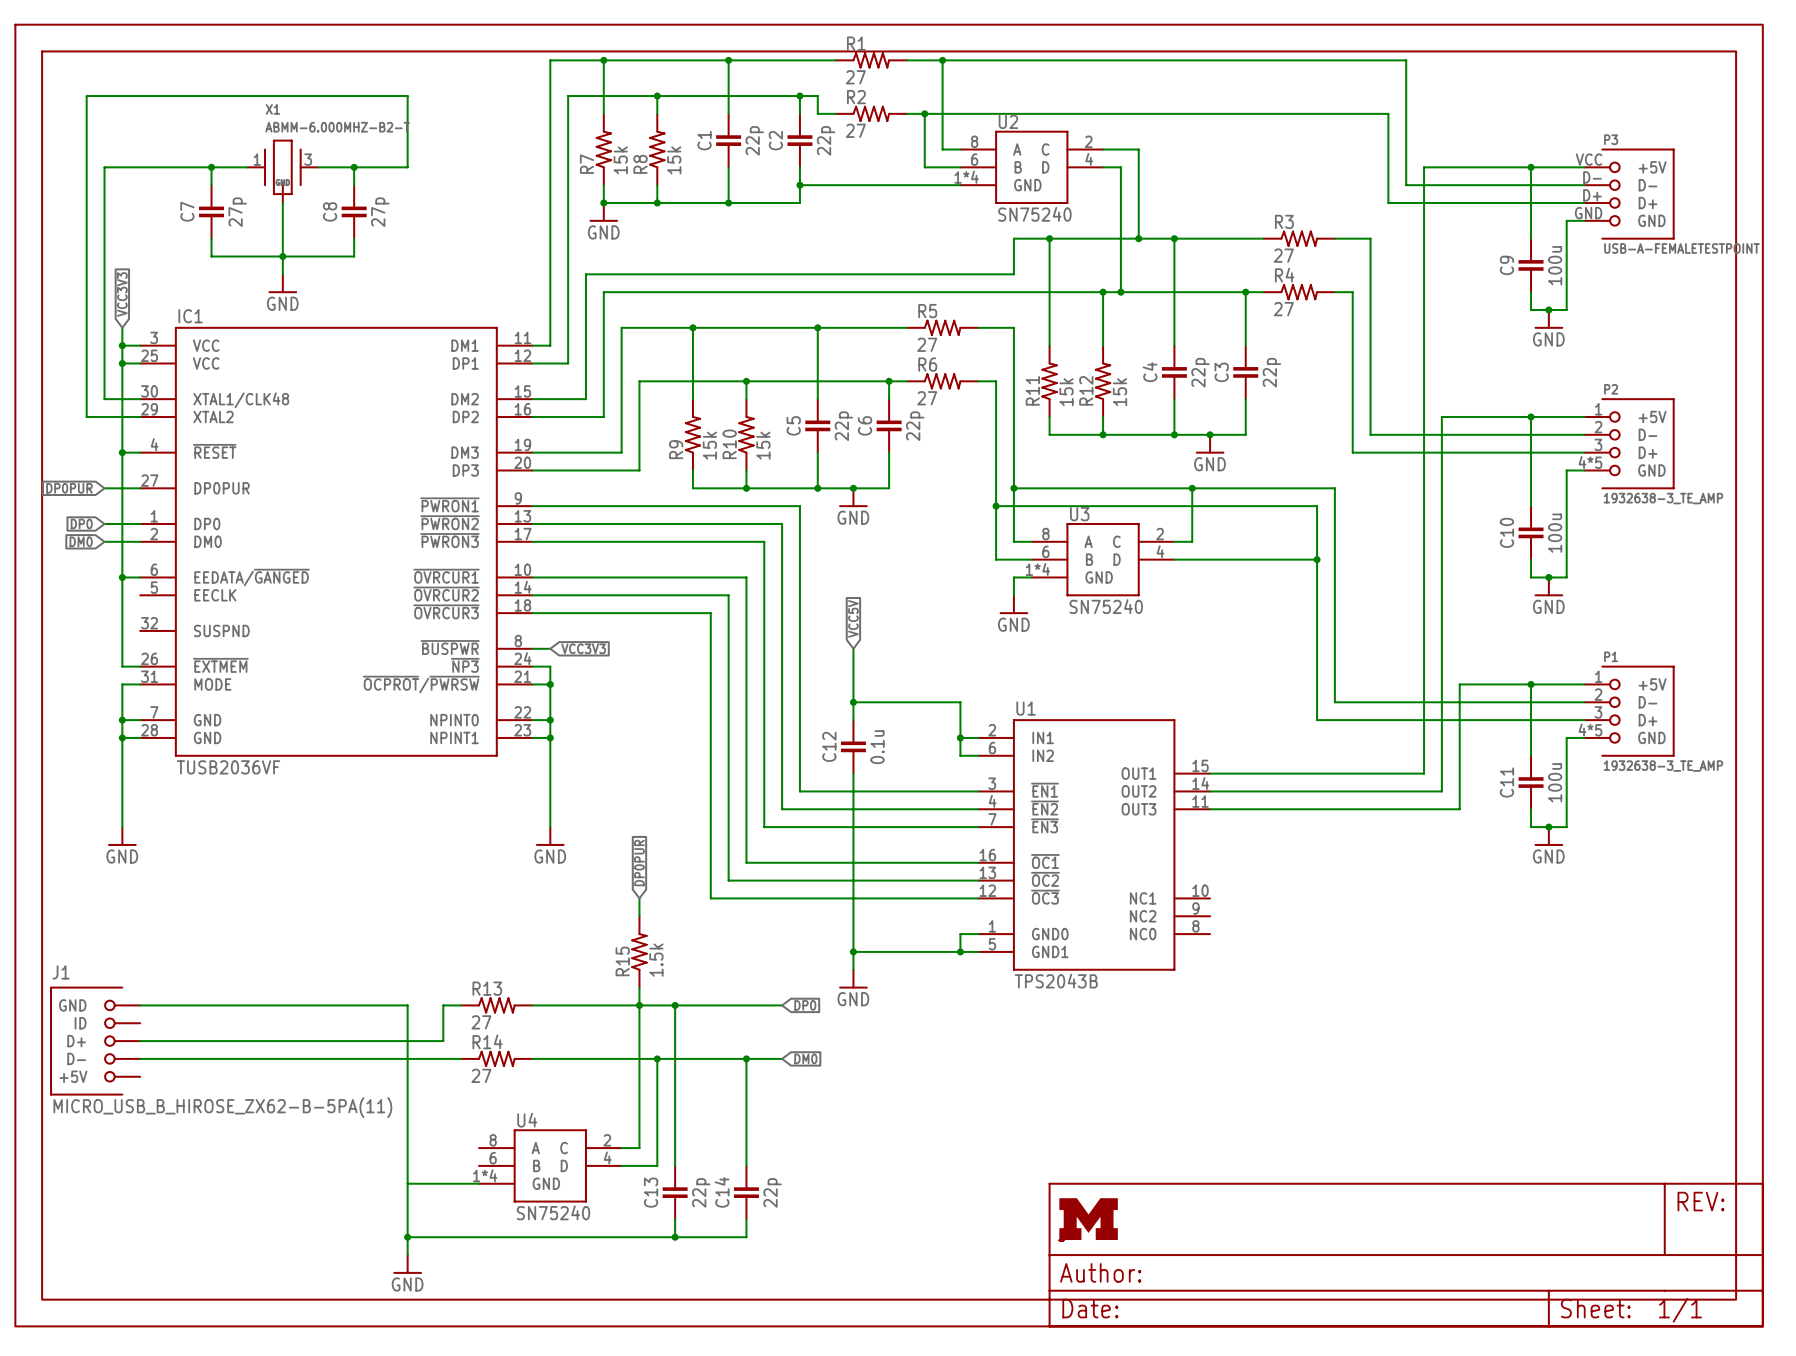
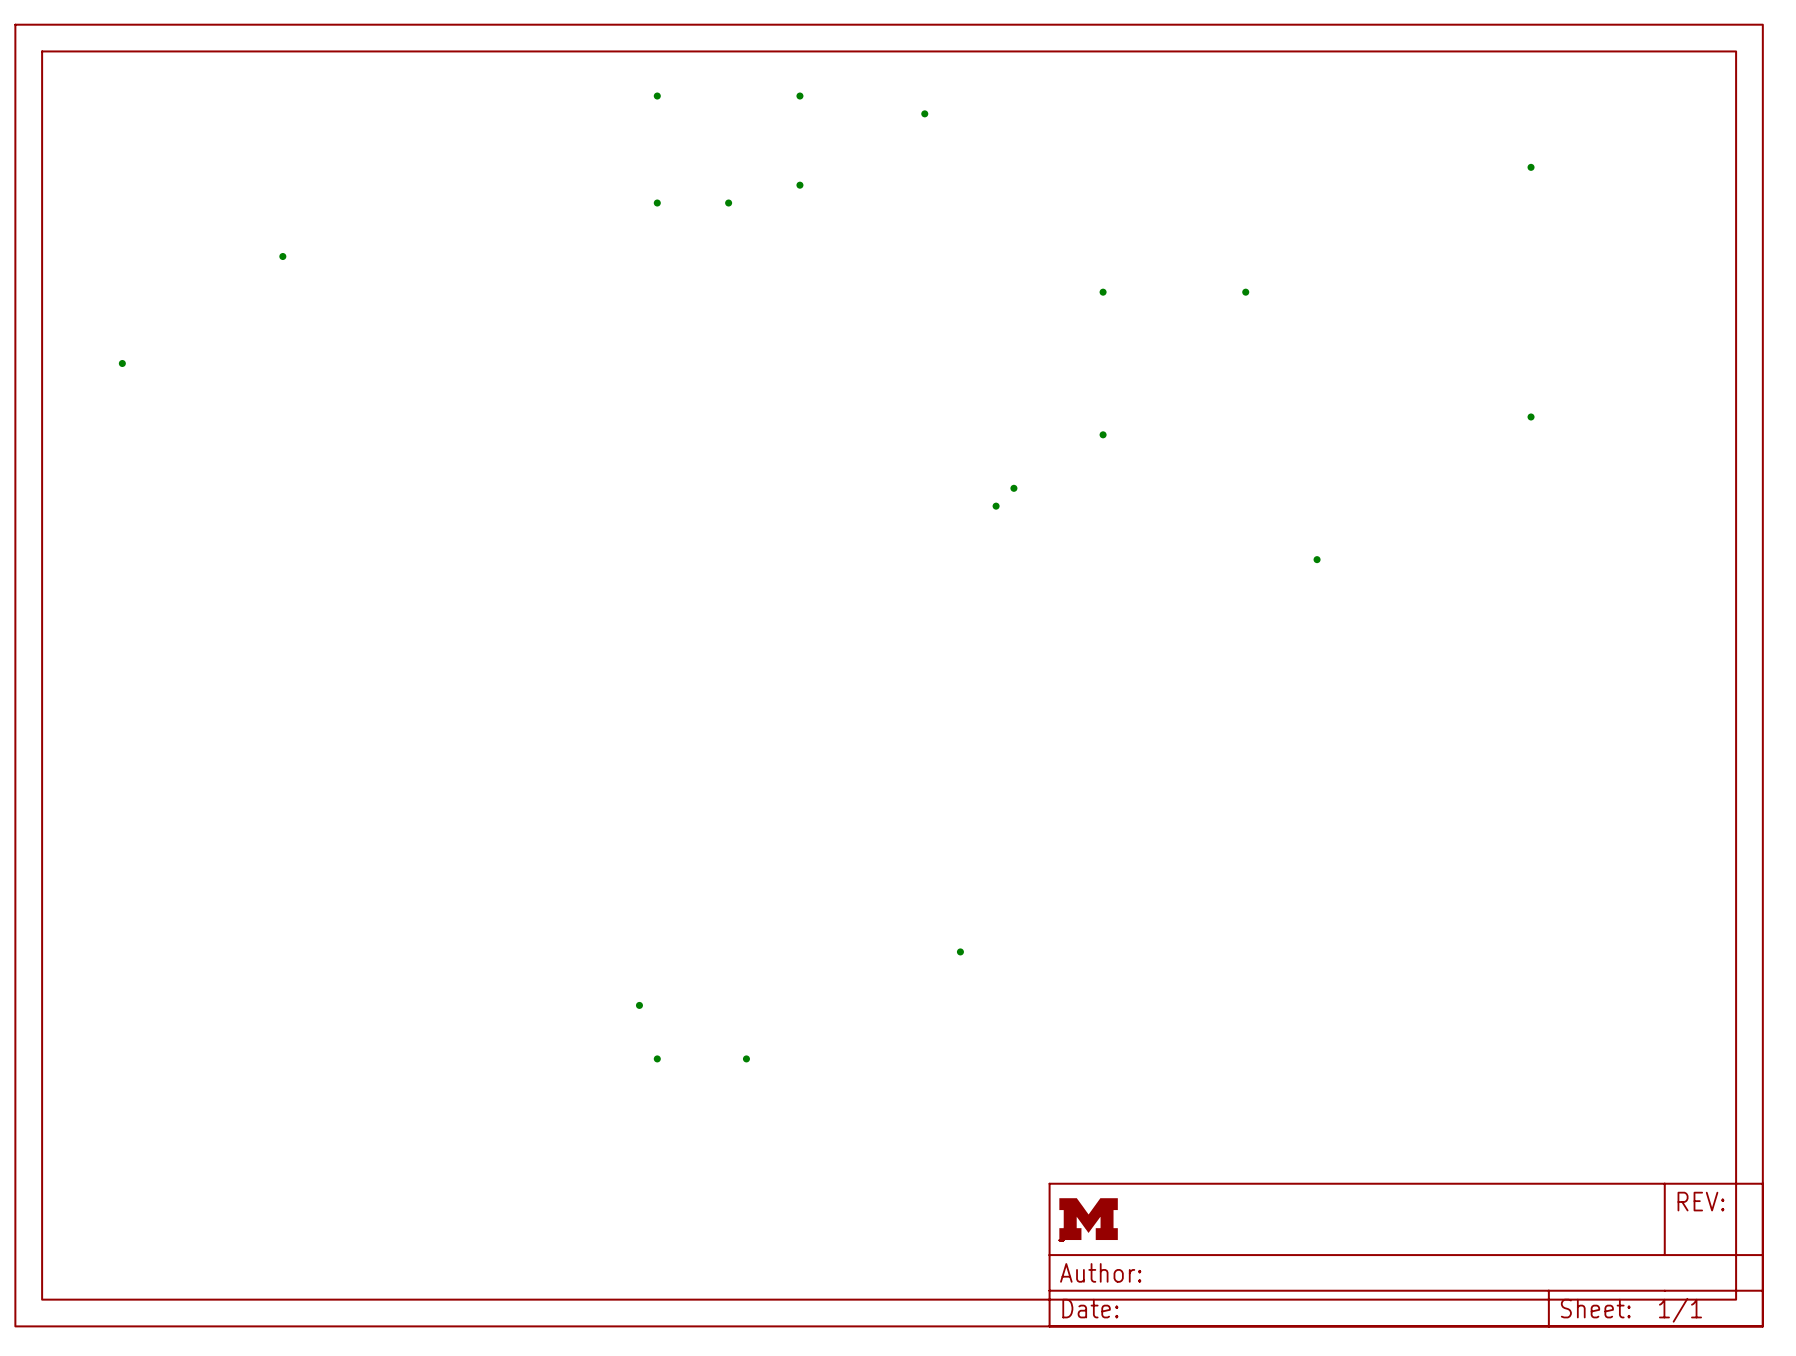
wire: (603, 60) (603, 113) -> none
junction: (603, 60) -> none
wire: (728, 60) (728, 113) -> none
junction: (728, 60) -> none
wire: (835, 60) (550, 60) (550, 345) (532, 345) -> none
R1: 27 (871, 60) -> none
wire: (906, 60) (1406, 60) (1406, 185) (1584, 185) -> none
wire: (942, 60) (942, 149) (960, 149) -> none
junction: (942, 60) -> none
wire: (657, 96) (657, 113) -> none
wire: (799, 96) (799, 113) -> none
wire: (835, 113) (817, 113) (817, 96) (568, 96) (568, 363) (532, 363) -> none
R2: 27 (871, 113) -> none
wire: (906, 113) (1388, 113) (1388, 203) (1584, 203) -> none
wire: (924, 113) (924, 167) (960, 167) -> none
C1: 22p (728, 140) -> none
C2: 22p (799, 140) -> none
R7: 15k (603, 149) -> none
R8: 15k (657, 149) -> none
wire: (1103, 149) (1138, 149) (1138, 238) -> none
wire: (211, 167) (211, 185) -> none
junction: (211, 167) -> none
wire: (247, 167) (104, 167) (104, 399) (140, 399) -> none
wire: (318, 167) (407, 167) (407, 96) (86, 96) (86, 416) (140, 416) -> none
wire: (354, 167) (354, 185) -> none
junction: (354, 167) -> none
wire: (728, 167) (728, 203) -> none
wire: (799, 167) (799, 203) (603, 203) (603, 185) -> none
U2: SN75240 (1031, 167) -> none
wire: (1103, 167) (1120, 167) (1120, 292) -> none
wire: (1531, 167) (1531, 238) -> none
wire: (1584, 167) (1424, 167) (1424, 773) (1210, 773) -> none
X1: ABMM-6.000MHZ-B2-T (282, 171) -> none
wire: (657, 185) (657, 203) -> none
wire: (799, 185) (960, 185) -> none
P3: USB-A-FEMALETESTPOINT (1629, 194) -> none
wire: (282, 203) (282, 274) -> none
junction: (603, 203) -> none
C7: 27p (211, 211) -> none
C8: 27p (354, 211) -> none
power symbol: GND (603, 212) -> none
wire: (1584, 220) (1566, 220) (1566, 310) (1531, 310) (1531, 292) -> none
wire: (211, 238) (211, 256) (354, 256) (354, 238) -> none
wire: (1049, 238) (1049, 345) -> none
junction: (1049, 238) -> none
junction: (1138, 238) -> none
wire: (1174, 238) (1174, 345) -> none
junction: (1174, 238) -> none
wire: (1263, 238) (1013, 238) (1013, 274) (585, 274) (585, 399) (532, 399) -> none
R3: 27 (1299, 238) -> none
wire: (1334, 238) (1370, 238) (1370, 434) (1584, 434) -> none
C9: 100u (1531, 265) -> none
power symbol: GND (282, 283) -> none
wire: (1103, 292) (1103, 345) -> none
junction: (1120, 292) -> none
wire: (1245, 292) (1245, 345) -> none
wire: (1263, 292) (603, 292) (603, 416) (532, 416) -> none
R4: 27 (1299, 292) -> none
wire: (1334, 292) (1352, 292) (1352, 452) (1584, 452) -> none
global label: VCC3V3 (122, 294) -> none
junction: (1548, 310) -> none
power symbol: GND (1548, 319) -> none
wire: (122, 327) (122, 666) (140, 666) -> none
wire: (692, 327) (692, 399) -> none
junction: (692, 327) -> none
wire: (817, 327) (817, 399) -> none
junction: (817, 327) -> none
wire: (906, 327) (621, 327) (621, 452) (532, 452) -> none
R5: 27 (942, 327) -> none
wire: (978, 327) (1013, 327) (1013, 541) (1031, 541) -> none
wire: (122, 345) (140, 345) -> none
junction: (122, 345) -> none
wire: (122, 363) (140, 363) -> none
C4: 22p (1174, 372) -> none
C3: 22p (1245, 372) -> none
wire: (746, 381) (746, 399) -> none
junction: (746, 381) -> none
wire: (889, 381) (889, 399) -> none
junction: (889, 381) -> none
wire: (906, 381) (639, 381) (639, 470) (532, 470) -> none
R6: 27 (942, 381) -> none
wire: (978, 381) (996, 381) (996, 559) (1031, 559) -> none
R11: 15k (1049, 381) -> none
R12: 15k (1103, 381) -> none
wire: (1174, 399) (1174, 434) -> none
wire: (1245, 399) (1245, 434) (1049, 434) (1049, 416) -> none
wire: (1103, 416) (1103, 434) -> none
wire: (1531, 416) (1531, 506) -> none
wire: (1584, 416) (1441, 416) (1441, 791) (1210, 791) -> none
C5: 22p (817, 425) -> none
C6: 22p (889, 425) -> none
R9: 15k (692, 434) -> none
R10: 15k (746, 434) -> none
junction: (1174, 434) -> none
junction: (1210, 434) -> none
P2: 1932638-3_TE_AMP (1629, 443) -> none
power symbol: GND (1210, 444) -> none
wire: (122, 452) (140, 452) -> none
junction: (122, 452) -> none
wire: (817, 452) (817, 488) -> none
wire: (889, 452) (889, 488) (692, 488) (692, 470) -> none
wire: (746, 470) (746, 488) -> none
wire: (1584, 470) (1566, 470) (1566, 577) (1531, 577) (1531, 559) -> none
global label: DP0PUR (69, 488) -> none
wire: (104, 488) (140, 488) -> none
junction: (746, 488) -> none
junction: (817, 488) -> none
junction: (853, 488) -> none
wire: (1013, 488) (1334, 488) (1334, 702) (1584, 702) -> none
wire: (1192, 488) (1192, 541) (1174, 541) -> none
junction: (1192, 488) -> none
power symbol: GND (853, 497) -> none
wire: (532, 506) (799, 506) (799, 791) (978, 791) -> none
wire: (996, 506) (1317, 506) (1317, 720) (1584, 720) -> none
global label: DP0 (81, 523) -> none
wire: (104, 523) (140, 523) -> none
wire: (532, 523) (782, 523) (782, 809) (978, 809) -> none
C10: 100u (1531, 532) -> none
global label: DM0 (81, 541) -> none
wire: (104, 541) (140, 541) -> none
IC1: TUSB2036VF (336, 541) -> none
wire: (532, 541) (764, 541) (764, 827) (978, 827) -> none
U3: SN75240 (1103, 559) -> none
wire: (1174, 559) (1317, 559) -> none
wire: (122, 577) (140, 577) -> none
junction: (122, 577) -> none
wire: (532, 577) (746, 577) (746, 862) (978, 862) -> none
wire: (1031, 577) (1013, 577) (1013, 595) -> none
junction: (1548, 577) -> none
power symbol: GND (1548, 586) -> none
wire: (532, 595) (728, 595) (728, 880) (978, 880) -> none
power symbol: GND (1013, 604) -> none
wire: (532, 613) (710, 613) (710, 898) (978, 898) -> none
global label: VCC5V (853, 618) -> none
wire: (532, 648) (550, 648) -> none
global label: VCC3V3 (583, 648) -> none
wire: (853, 648) (853, 720) -> none
wire: (532, 666) (550, 666) (550, 827) -> none
wire: (140, 684) (122, 684) (122, 827) -> none
wire: (532, 684) (550, 684) -> none
junction: (550, 684) -> none
wire: (1531, 684) (1531, 755) -> none
junction: (1531, 684) -> none
wire: (1584, 684) (1459, 684) (1459, 809) (1210, 809) -> none
wire: (853, 702) (960, 702) (960, 755) (978, 755) -> none
junction: (853, 702) -> none
P1: 1932638-3_TE_AMP (1629, 711) -> none
wire: (122, 720) (140, 720) -> none
junction: (122, 720) -> none
wire: (532, 720) (550, 720) -> none
junction: (550, 720) -> none
wire: (122, 737) (140, 737) -> none
junction: (122, 737) -> none
wire: (532, 737) (550, 737) -> none
junction: (550, 737) -> none
wire: (960, 737) (978, 737) -> none
junction: (960, 737) -> none
wire: (1584, 737) (1566, 737) (1566, 827) (1531, 827) (1531, 809) -> none
C12: 0.1u (853, 746) -> none
wire: (853, 773) (853, 969) -> none
C11: 100u (1531, 782) -> none
junction: (1548, 827) -> none
power symbol: GND (122, 836) -> none
power symbol: GND (550, 836) -> none
power symbol: GND (1548, 836) -> none
U1: TPS2043B (1094, 844) -> none
global label: DP0PUR (639, 863) -> none
wire: (639, 898) (639, 916) -> none
wire: (978, 934) (960, 934) (960, 951) -> none
R15: 1.5k (639, 951) -> none
wire: (853, 951) (978, 951) -> none
junction: (853, 951) -> none
power symbol: GND (853, 979) -> none
wire: (639, 987) (639, 1148) (621, 1148) -> none
wire: (140, 1005) (407, 1005) (407, 1255) -> none
wire: (461, 1005) (443, 1005) (443, 1041) (140, 1041) -> none
R13: 27 (496, 1005) -> none
wire: (532, 1005) (782, 1005) -> none
wire: (675, 1005) (675, 1165) -> none
junction: (675, 1005) -> none
global label: DP0 (805, 1005) -> none
J1: MICRO_USB_B_HIROSE_ZX62-B-5PA(11) (95, 1041) -> none
wire: (140, 1058) (461, 1058) -> none
R14: 27 (496, 1058) -> none
wire: (532, 1058) (782, 1058) -> none
wire: (657, 1058) (657, 1165) (621, 1165) -> none
wire: (746, 1058) (746, 1165) -> none
global label: DM0 (805, 1058) -> none
U4: SN75240 (550, 1165) -> none
wire: (407, 1183) (478, 1183) -> none
C13: 22p (675, 1192) -> none
C14: 22p (746, 1192) -> none
wire: (675, 1219) (675, 1237) -> none
wire: (746, 1219) (746, 1237) (407, 1237) -> none
junction: (407, 1237) -> none
junction: (675, 1237) -> none
power symbol: GND (407, 1264) -> none

